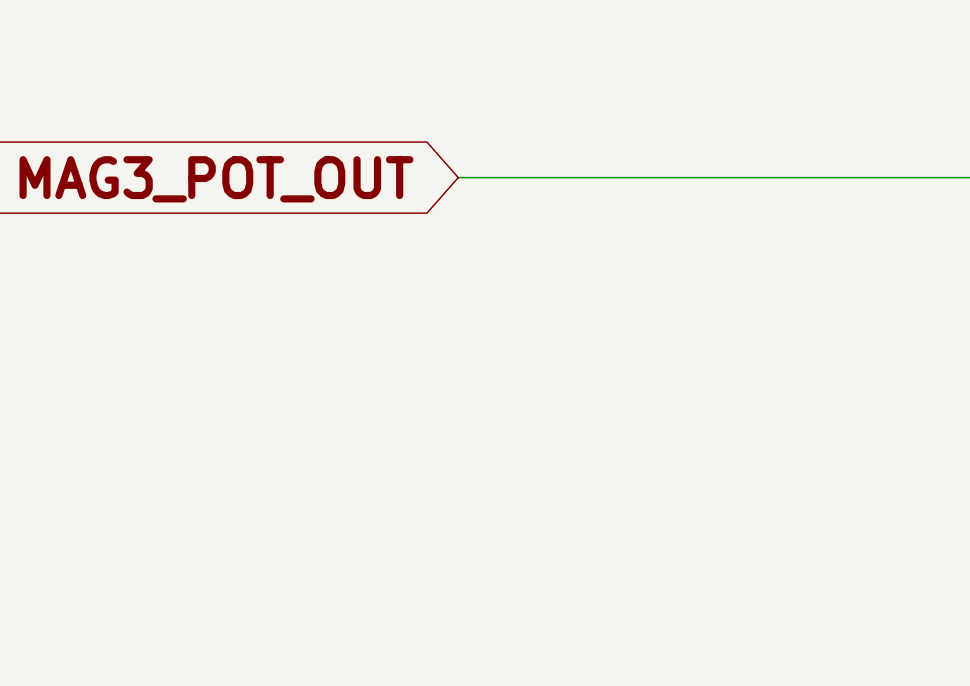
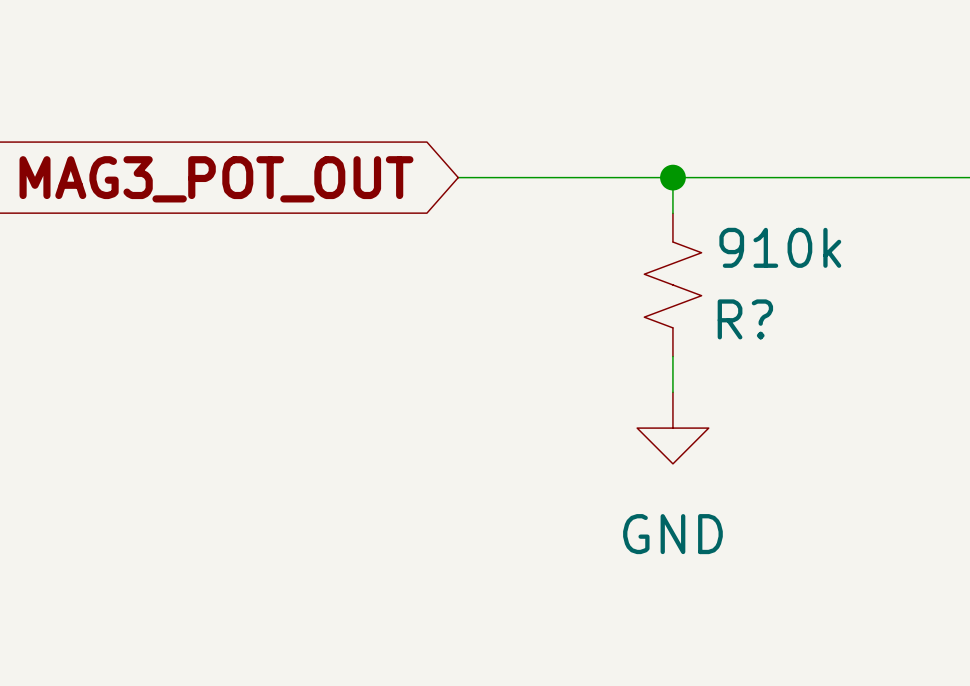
wire: none -> (672, 177) (672, 213)
junction: none -> (672, 177)
R?: none -> 910k (672, 284)
wire: none -> (672, 356) (672, 392)
power symbol: none -> GND (672, 428)

